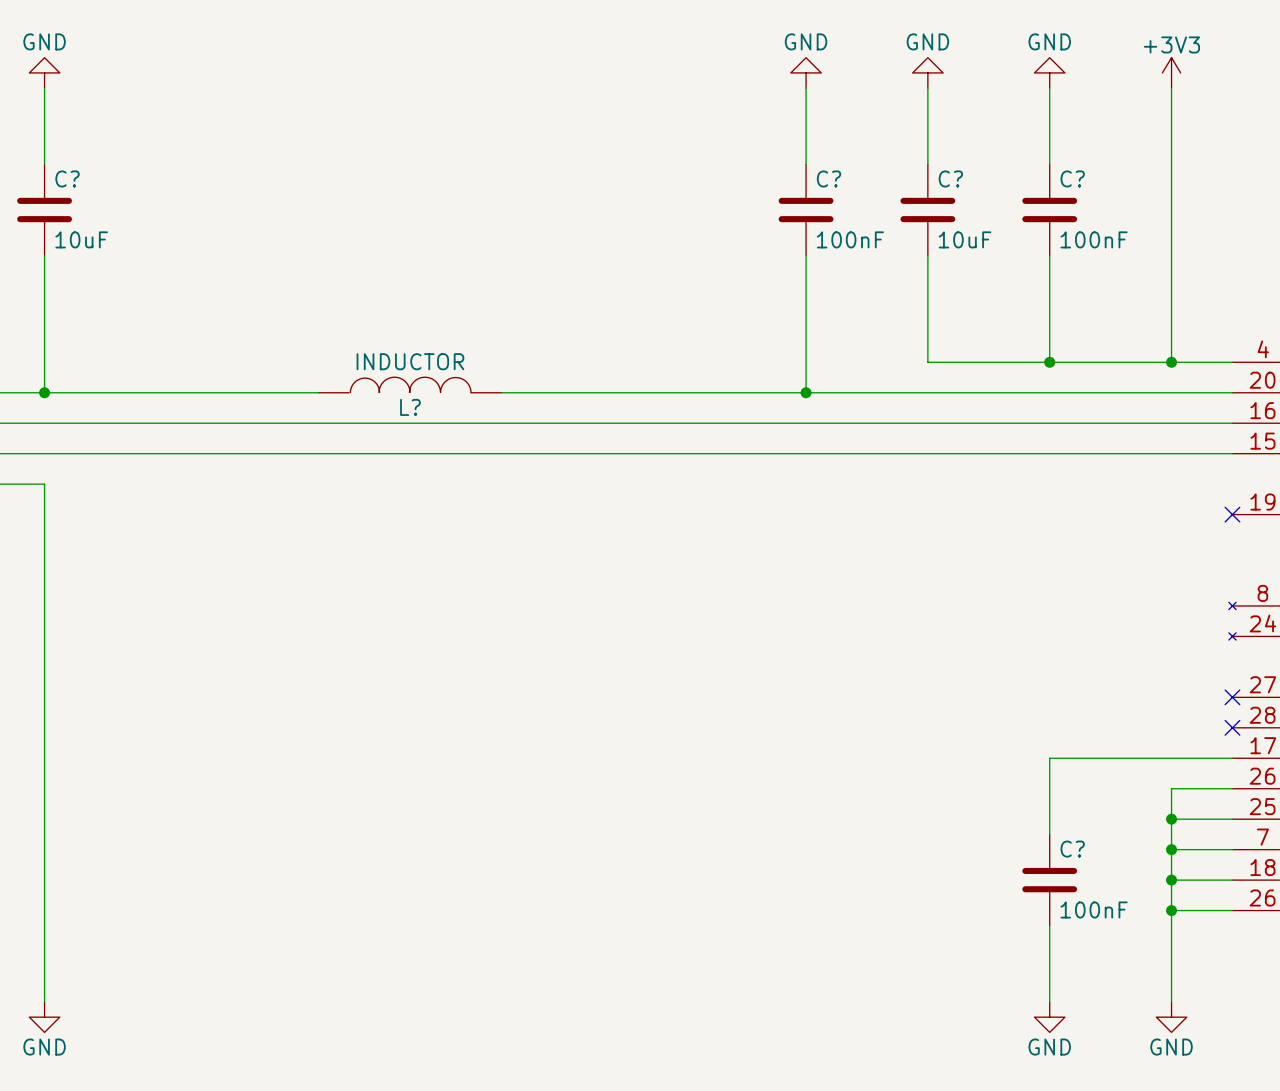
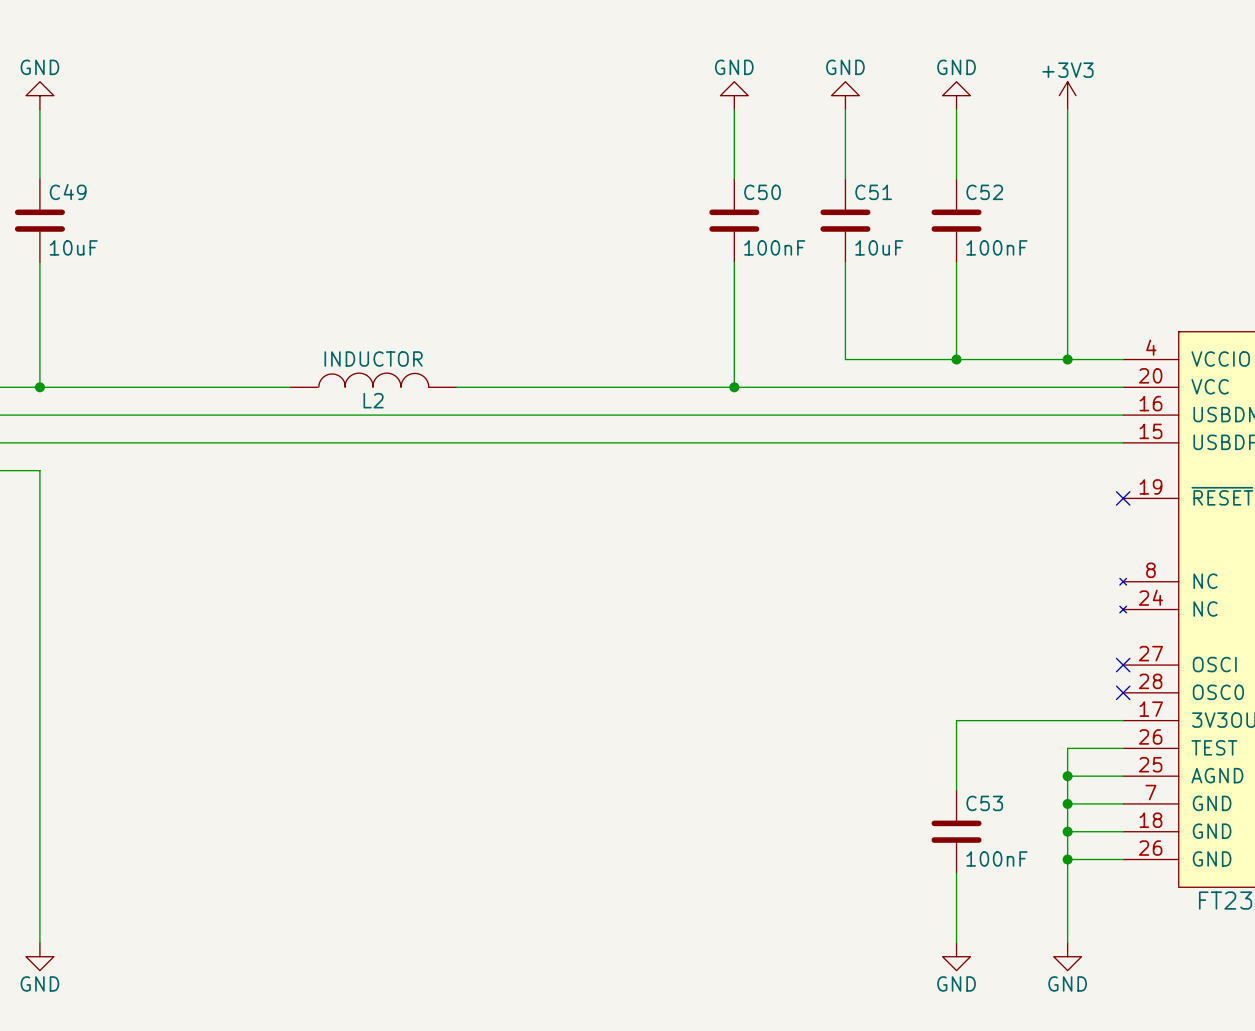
C? name: C? (67, 178) -> C49 (68, 192)
C? name: C? (829, 178) -> C50 (762, 192)
C? name: C? (950, 178) -> C51 (873, 192)
C? name: C? (1072, 178) -> C52 (984, 192)
L? name: L? (410, 407) -> L2 (373, 400)
C? name: C? (1072, 849) -> C53 (984, 803)

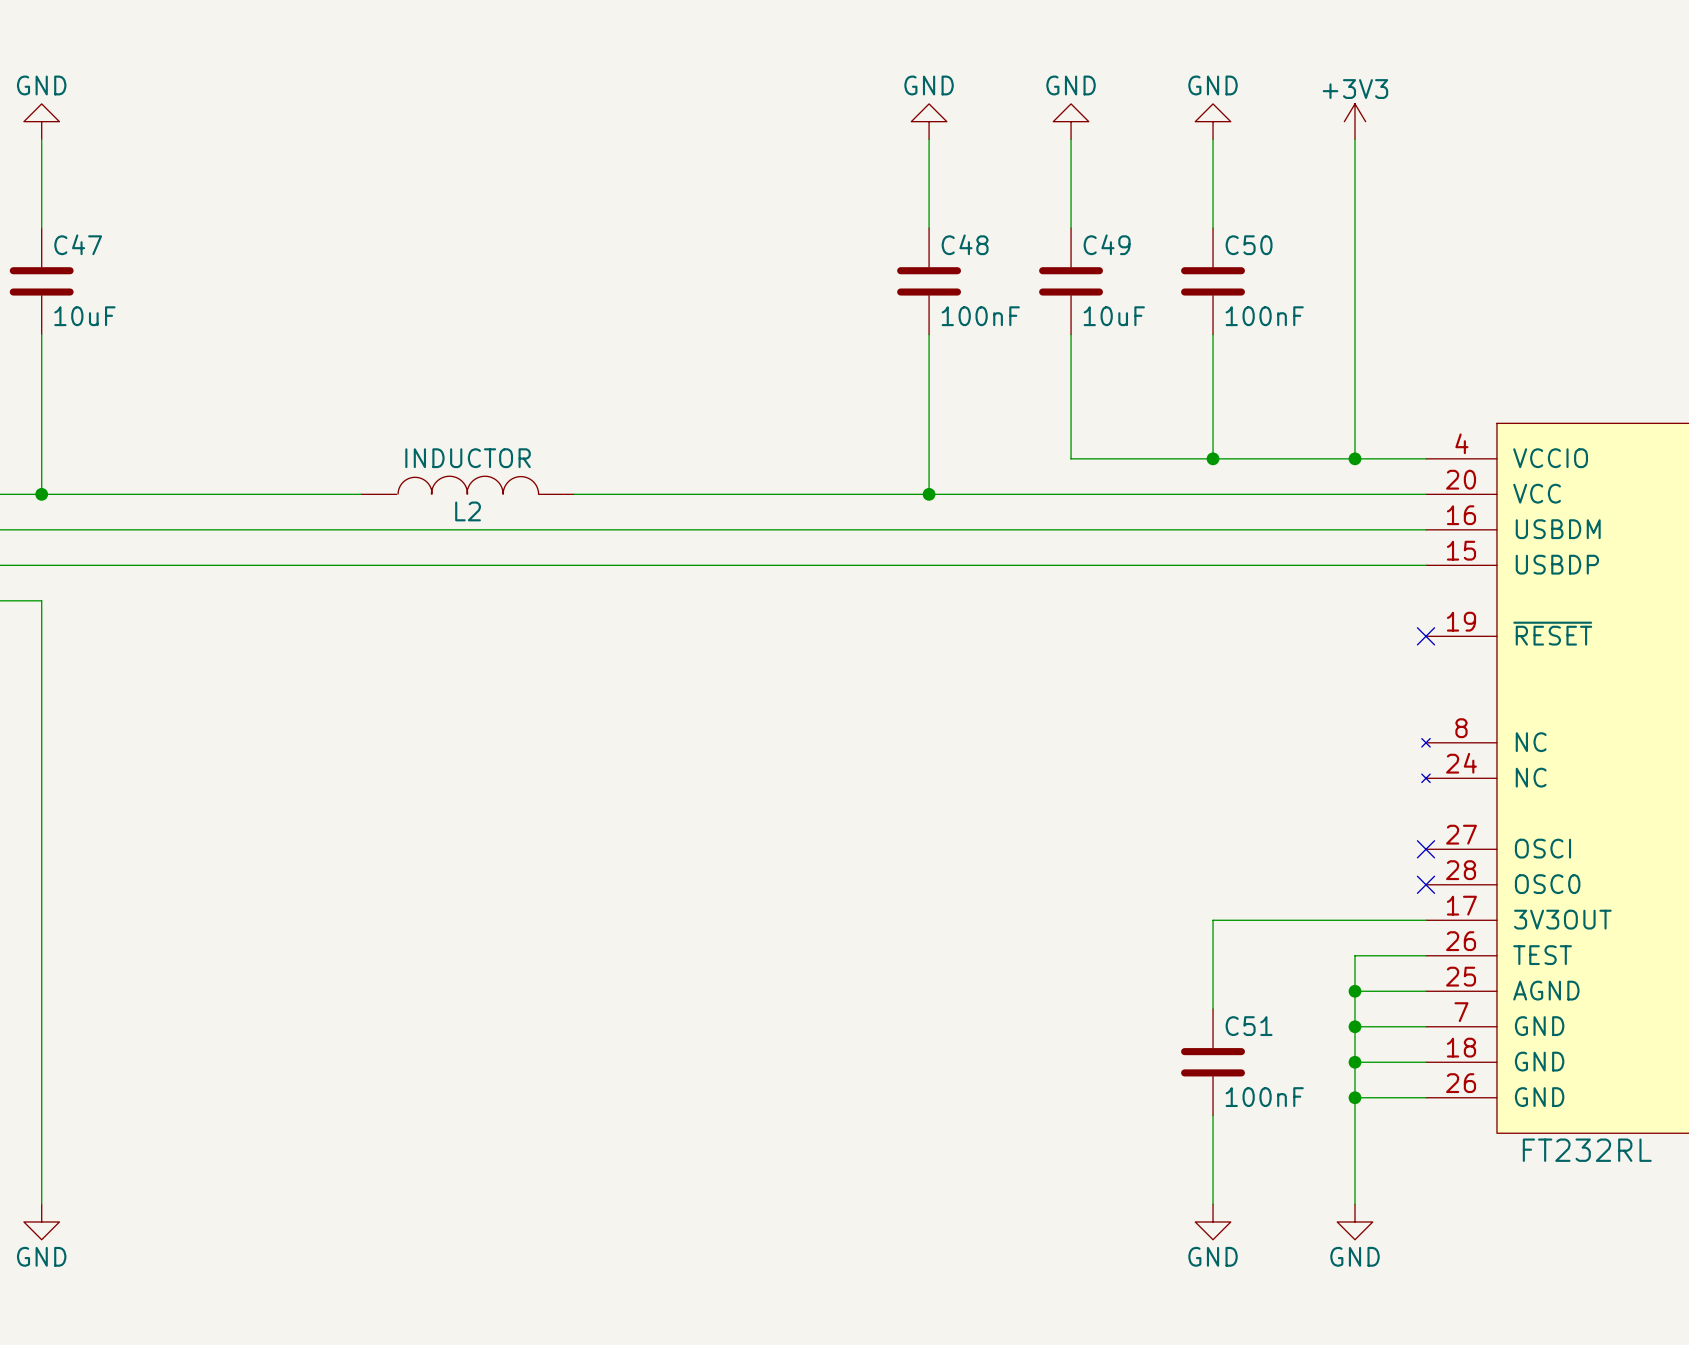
C49 name: C49 (68, 192) -> C47 (78, 244)
C50 name: C50 (762, 192) -> C48 (965, 244)
C51 name: C51 (873, 192) -> C49 (1107, 244)
C52 name: C52 (984, 192) -> C50 (1249, 245)
C53 name: C53 (984, 803) -> C51 (1249, 1026)

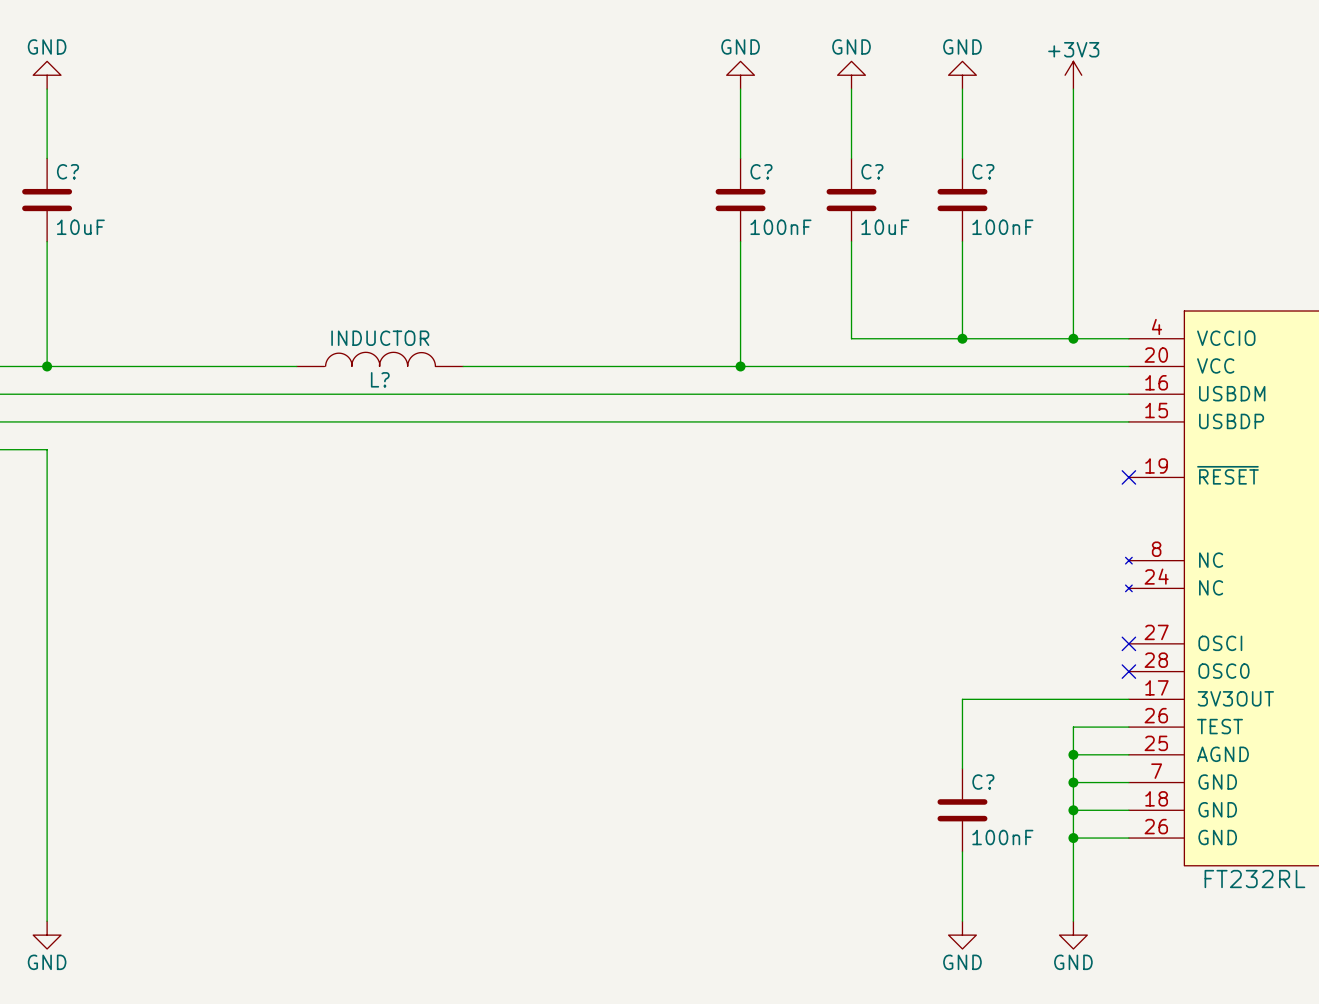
C47 name: C47 (78, 244) -> C? (68, 171)
C48 name: C48 (965, 244) -> C? (761, 171)
C49 name: C49 (1107, 244) -> C? (872, 171)
C50 name: C50 (1249, 245) -> C? (983, 171)
L2 name: L2 (468, 511) -> L? (380, 379)
C51 name: C51 (1249, 1026) -> C? (983, 782)

